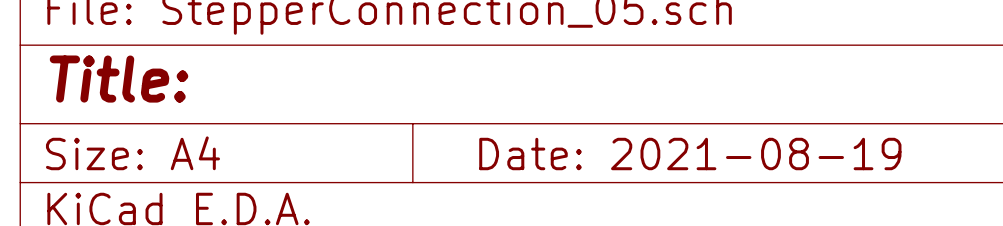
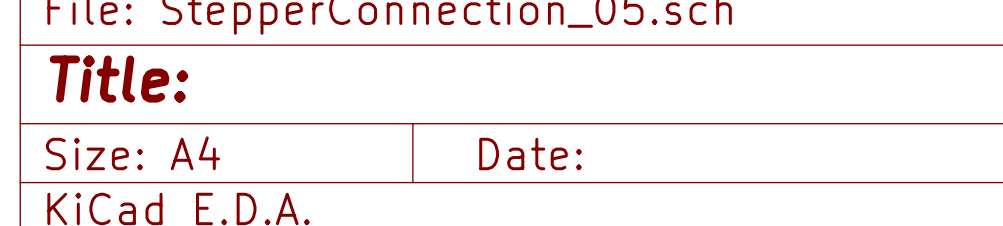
title block: Date: 2021-08-19 (690, 154) -> Date: (530, 154)

